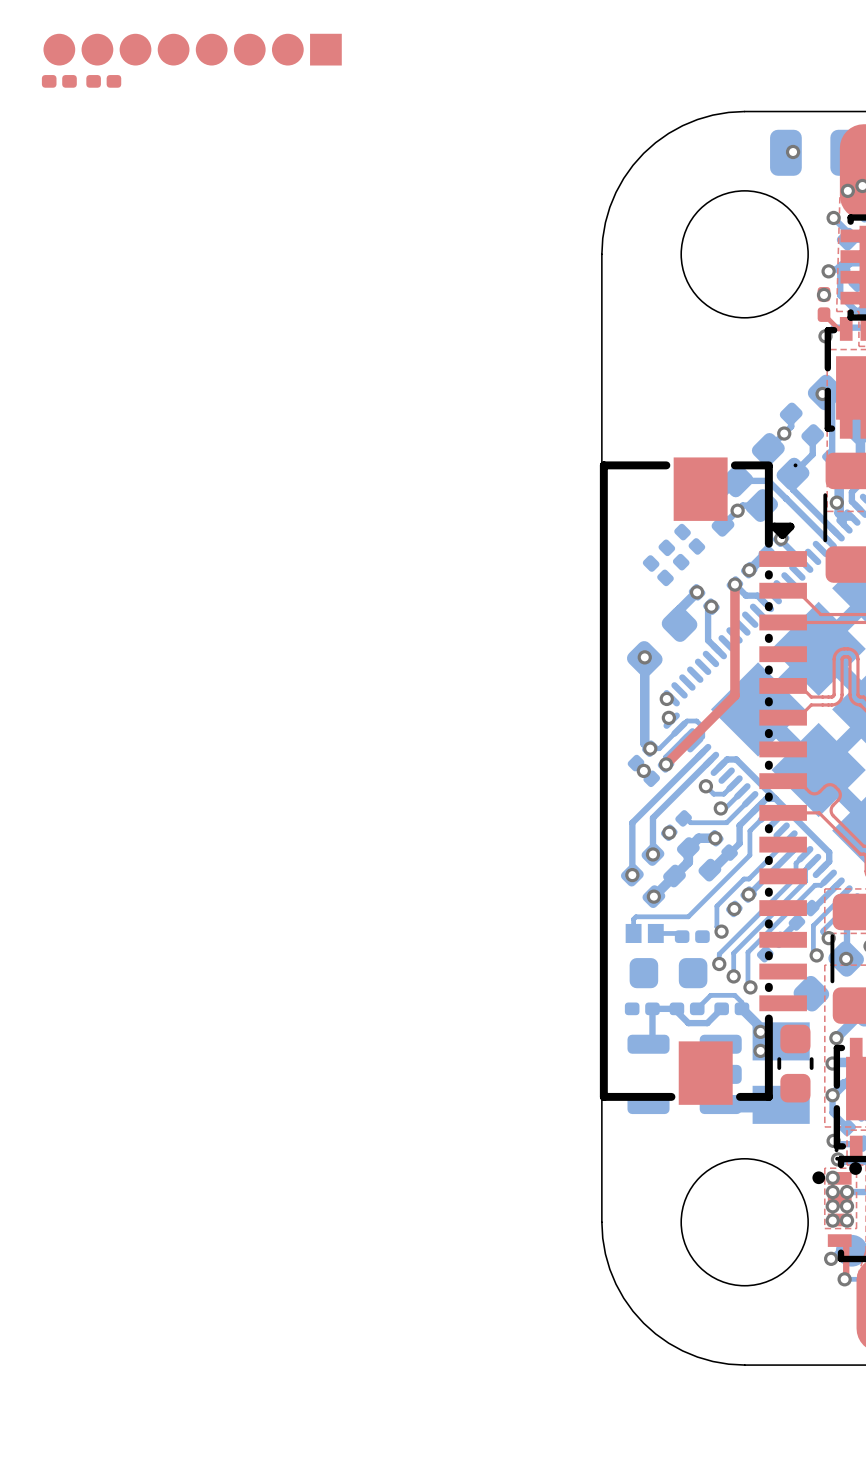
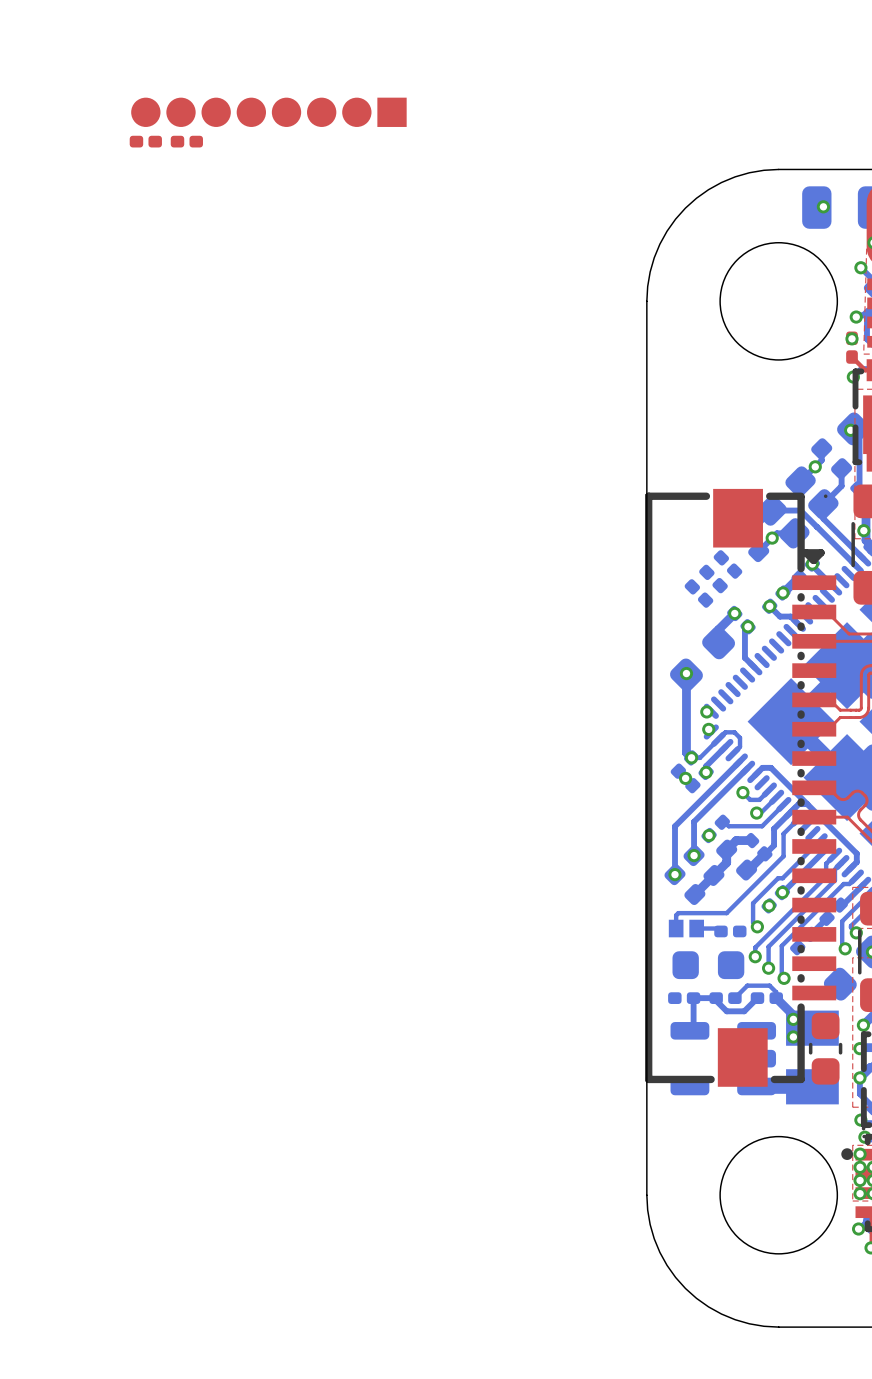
top track: (734, 584) (734, 695) (666, 764) -> none
via: (715, 838) -> none
via: (653, 896) -> none

